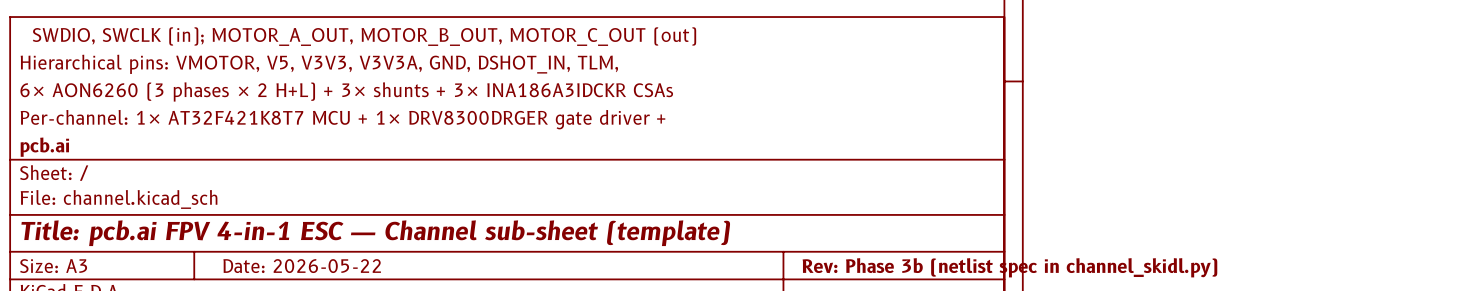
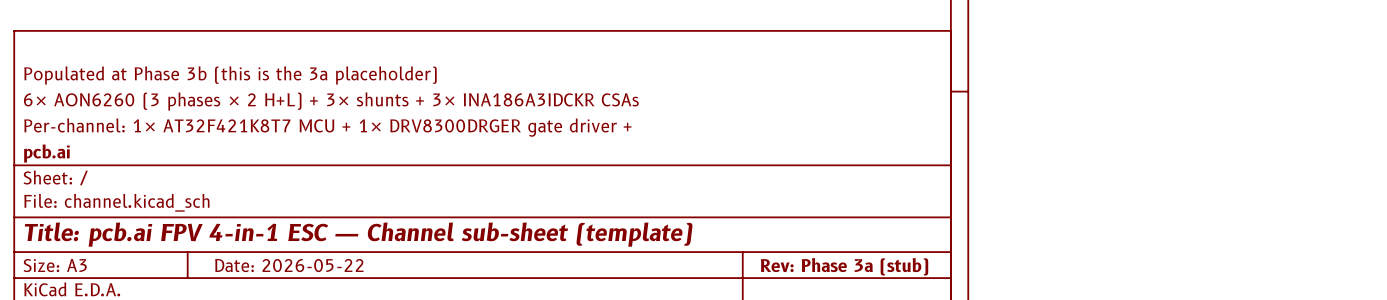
title block: SWDIO, SWCLK (in); MOTOR_A_OUT, MOTOR_B_OUT, MOTOR_C_OUT (out) (364, 36) -> none
title block: Hierarchical pins: VMOTOR, V5, V3V3, V3V3A, GND, DSHOT_IN, TLM, (319, 64) -> Populated at Phase 3b (this is the 3a placeholder) (230, 75)
title block: Rev: Phase 3b (netlist spec in channel_skidl.py) (1009, 267) -> Rev: Phase 3a (stub) (844, 266)

